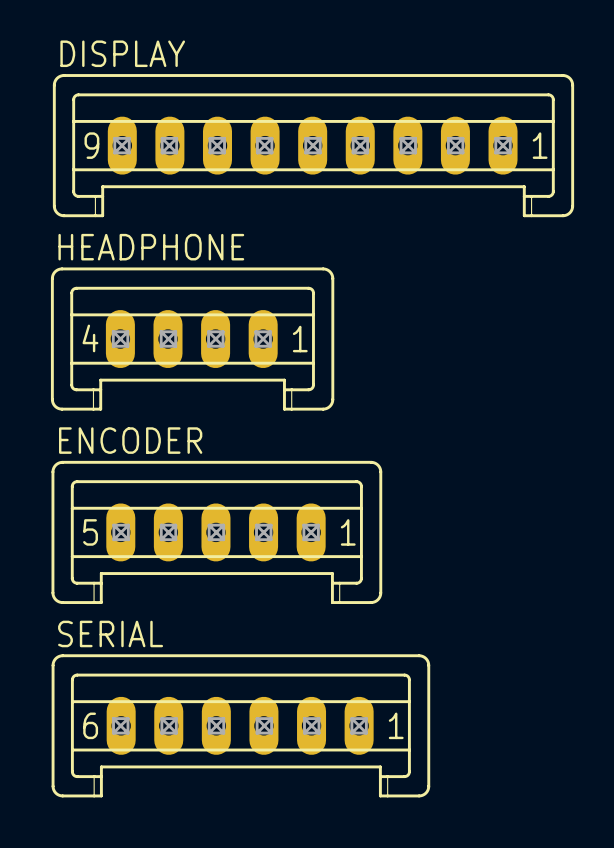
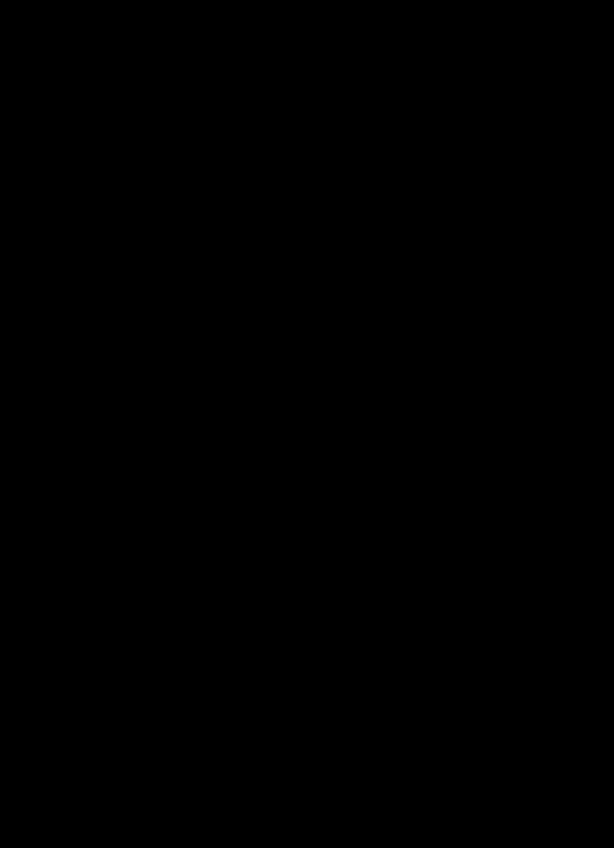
DISPLAY: (313, 145) -> none
HEADPHONE: (192, 339) -> none
ENCODER: (216, 532) -> none
SERIAL: (240, 725) -> none

